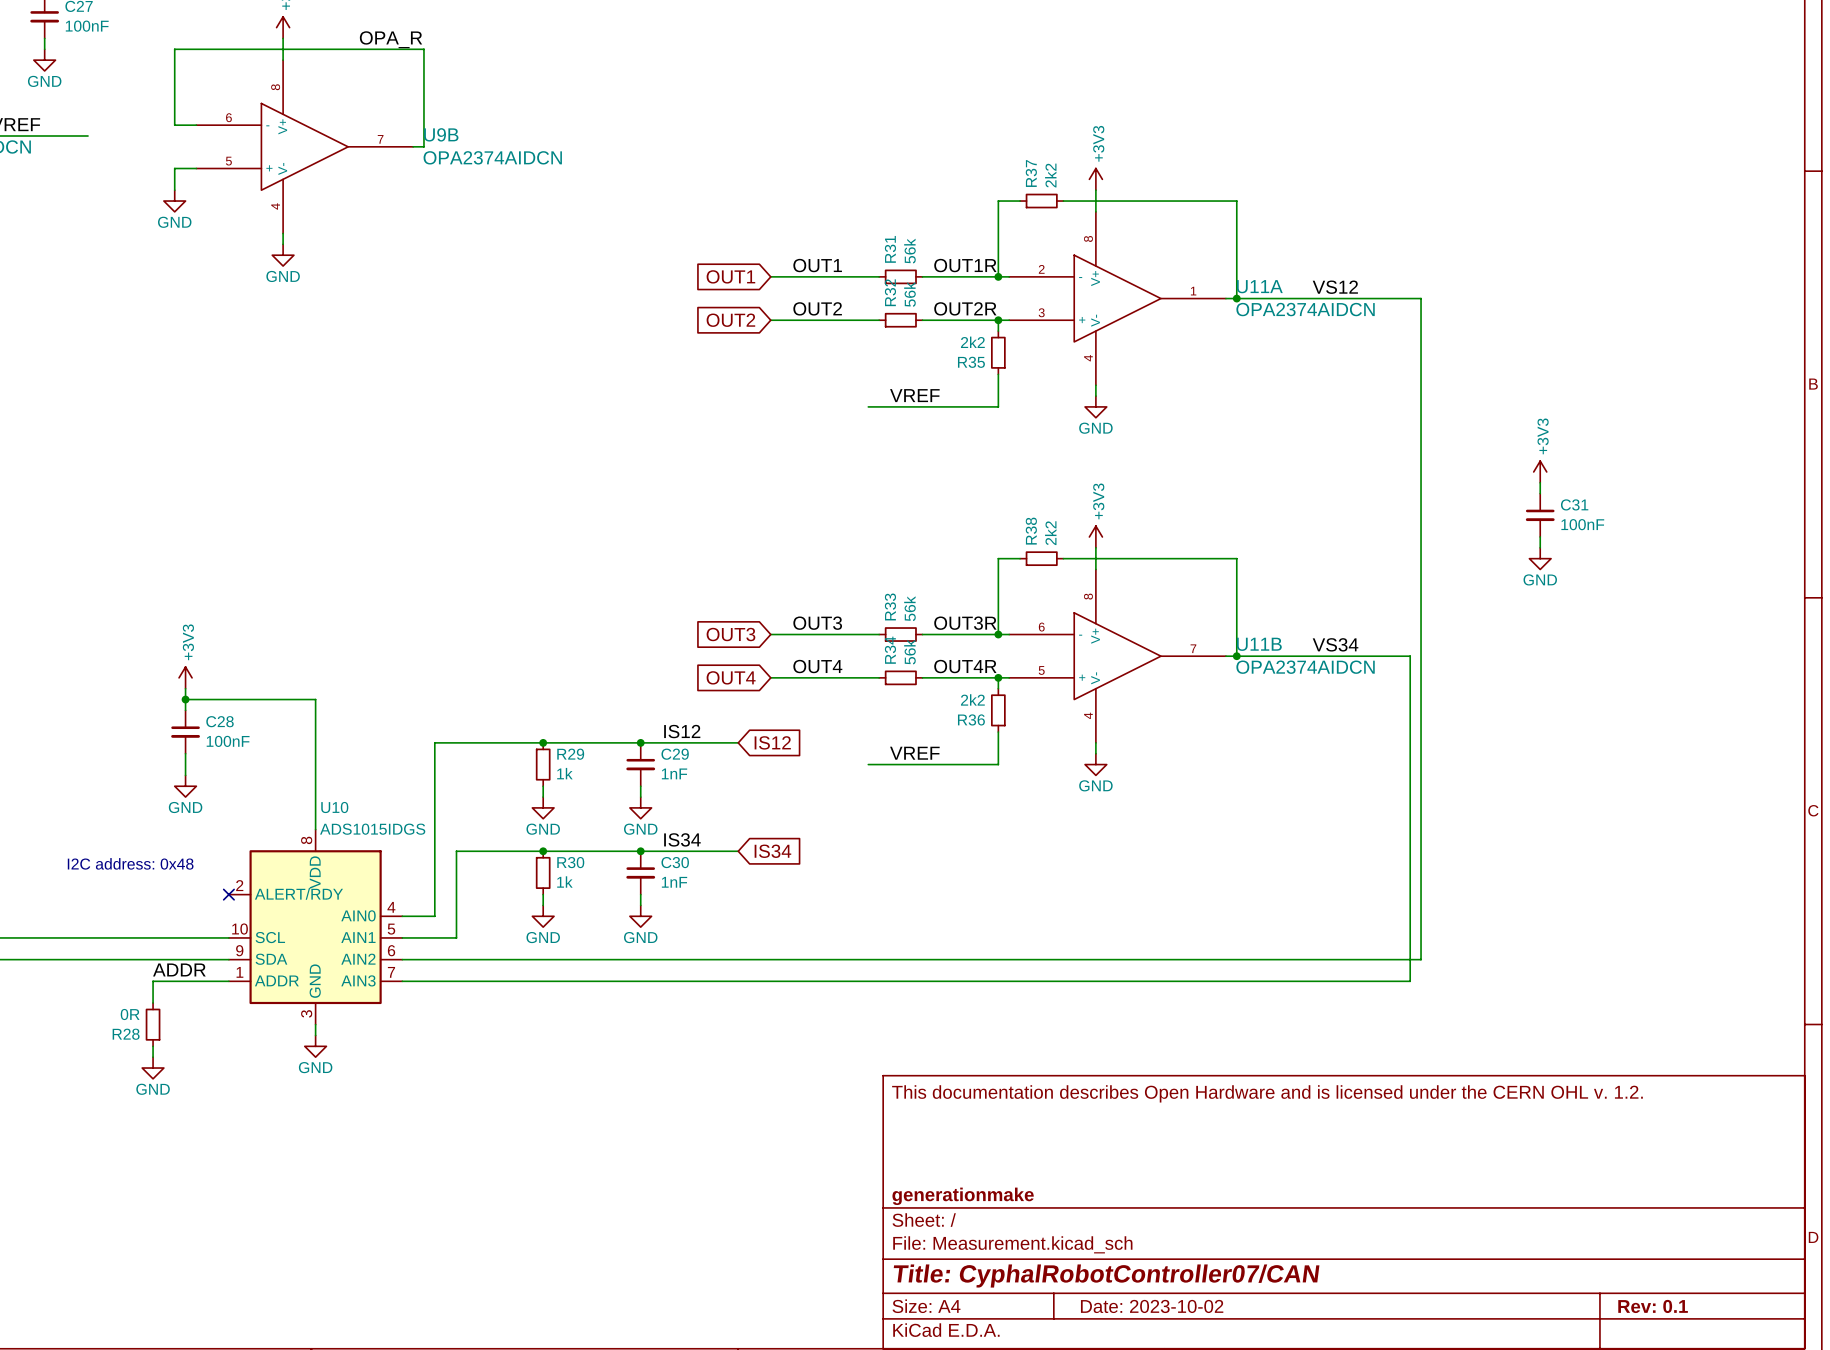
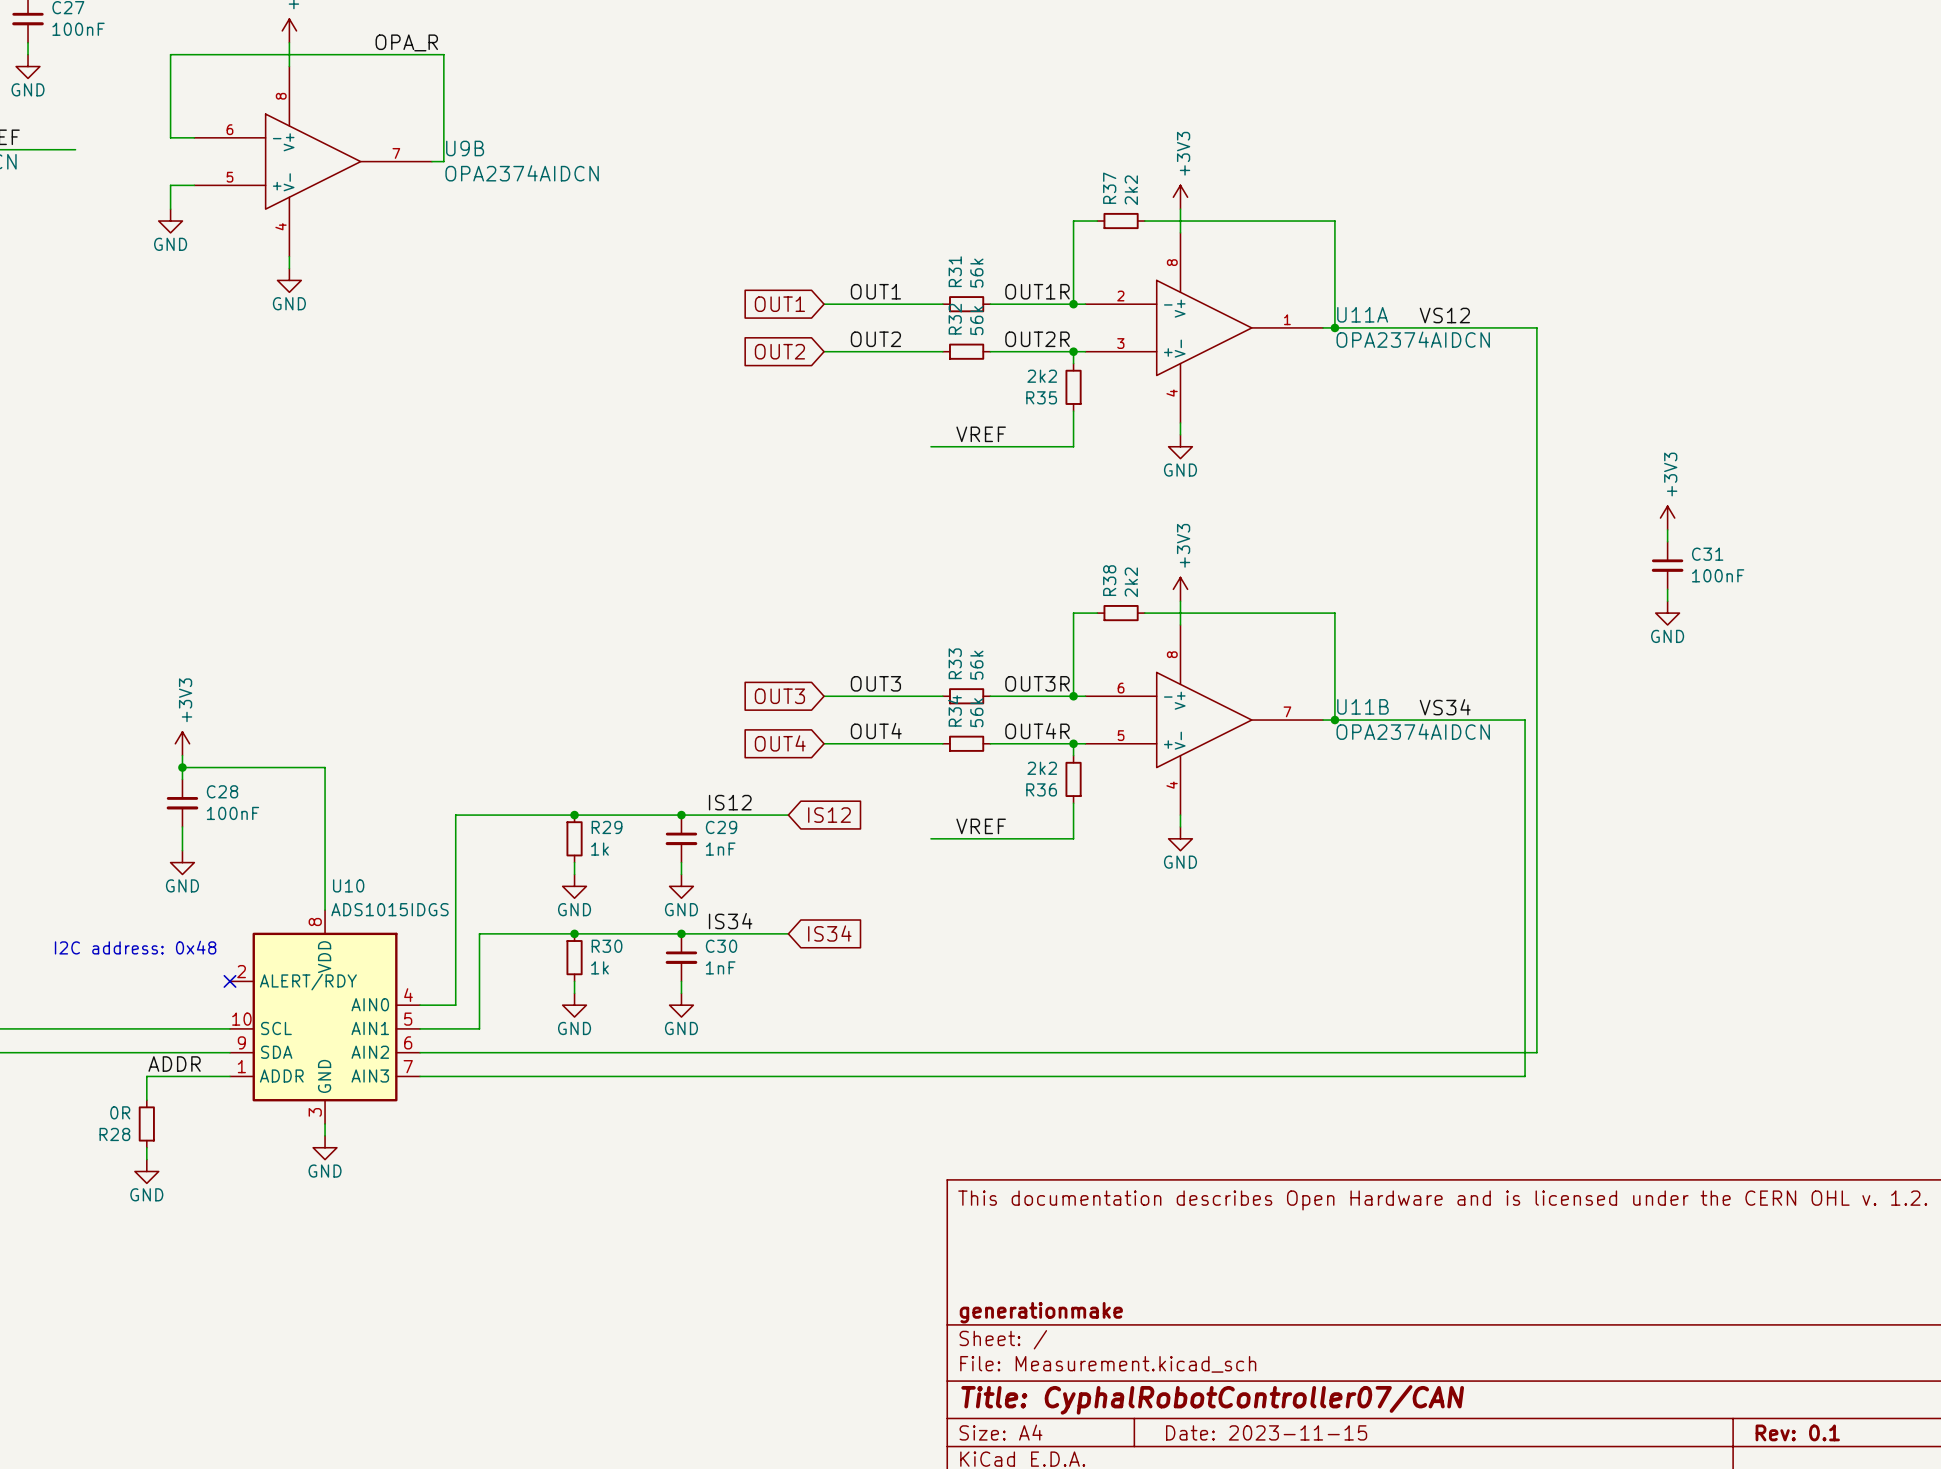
title block: Date: 2023-10-02 (1152, 1306) -> Date: 2023-11-15 (1266, 1432)

